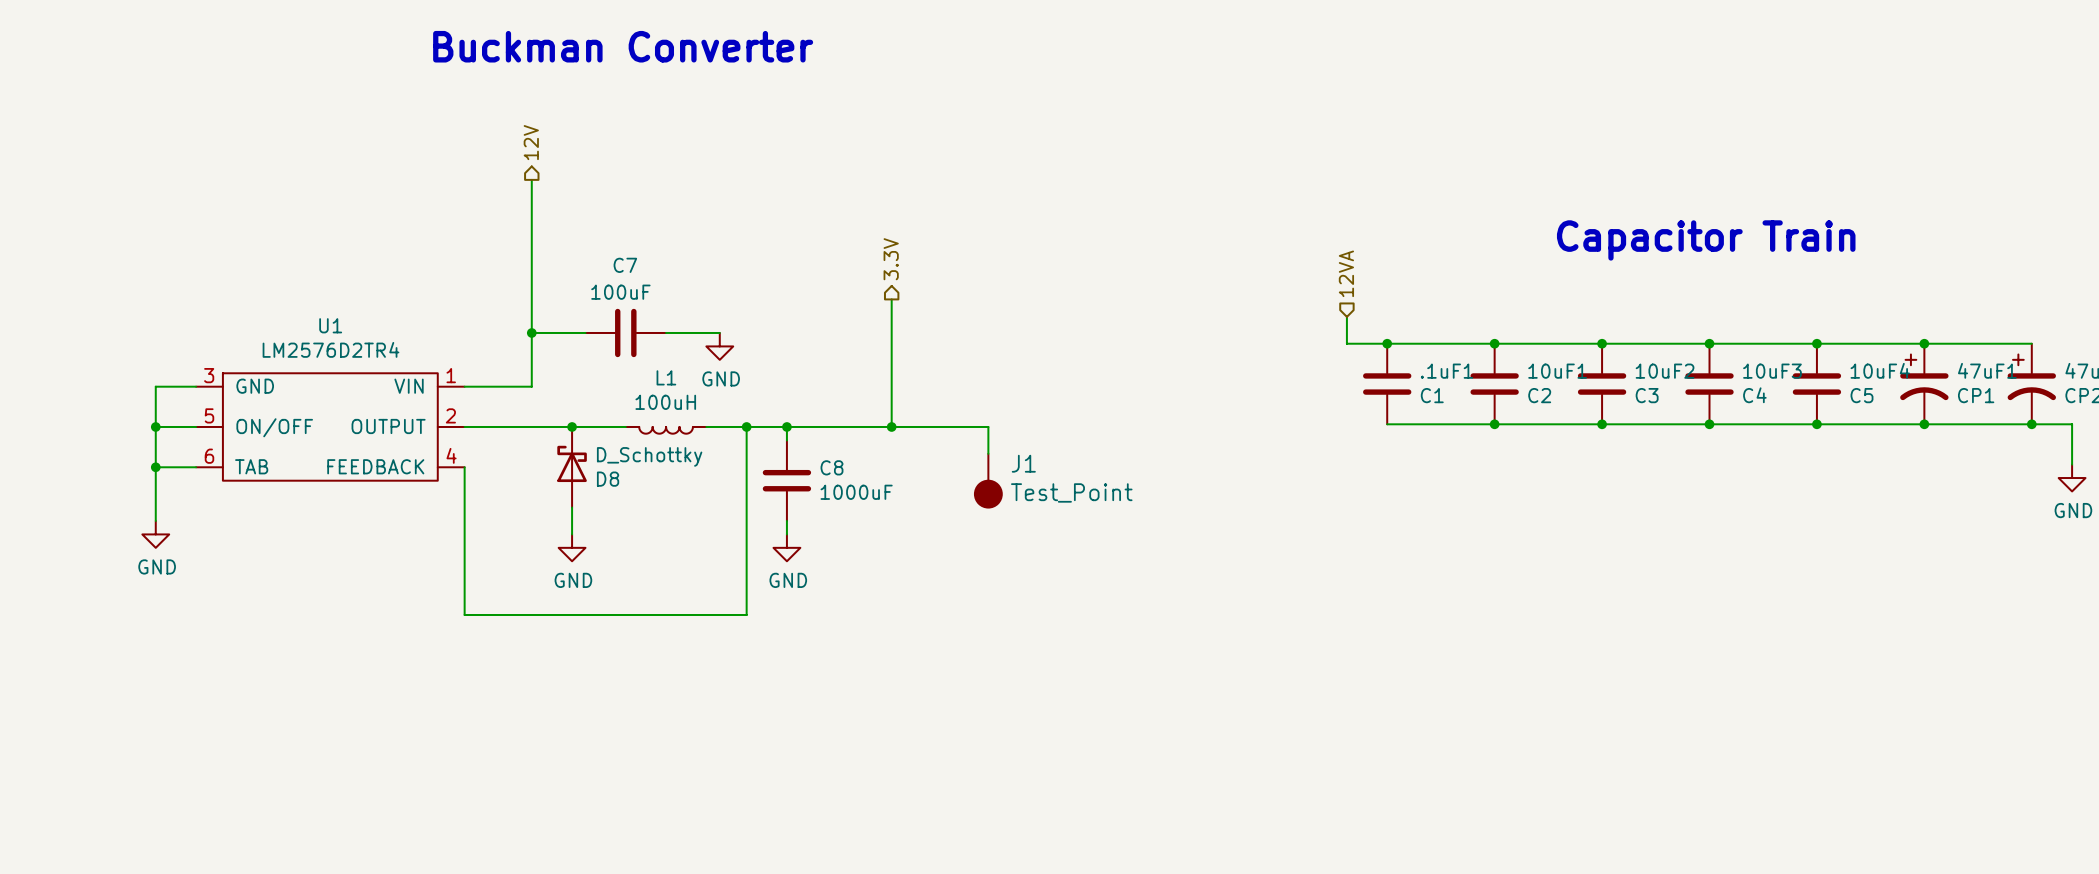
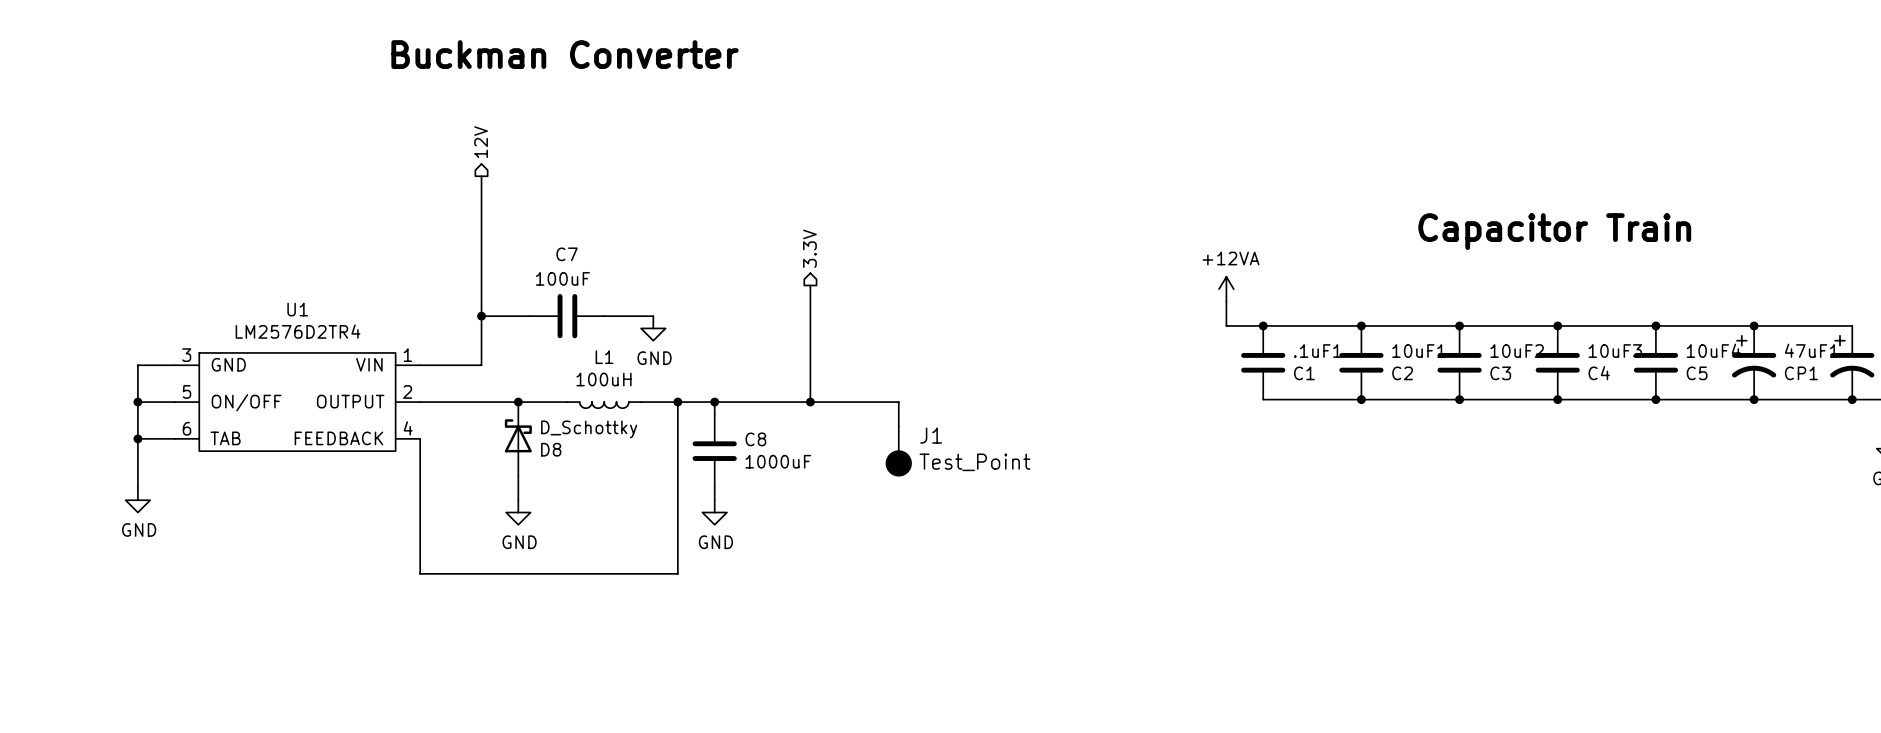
hierarchical label: 12VA (1346, 273) -> none
power symbol: none -> +12VA (1226, 289)

